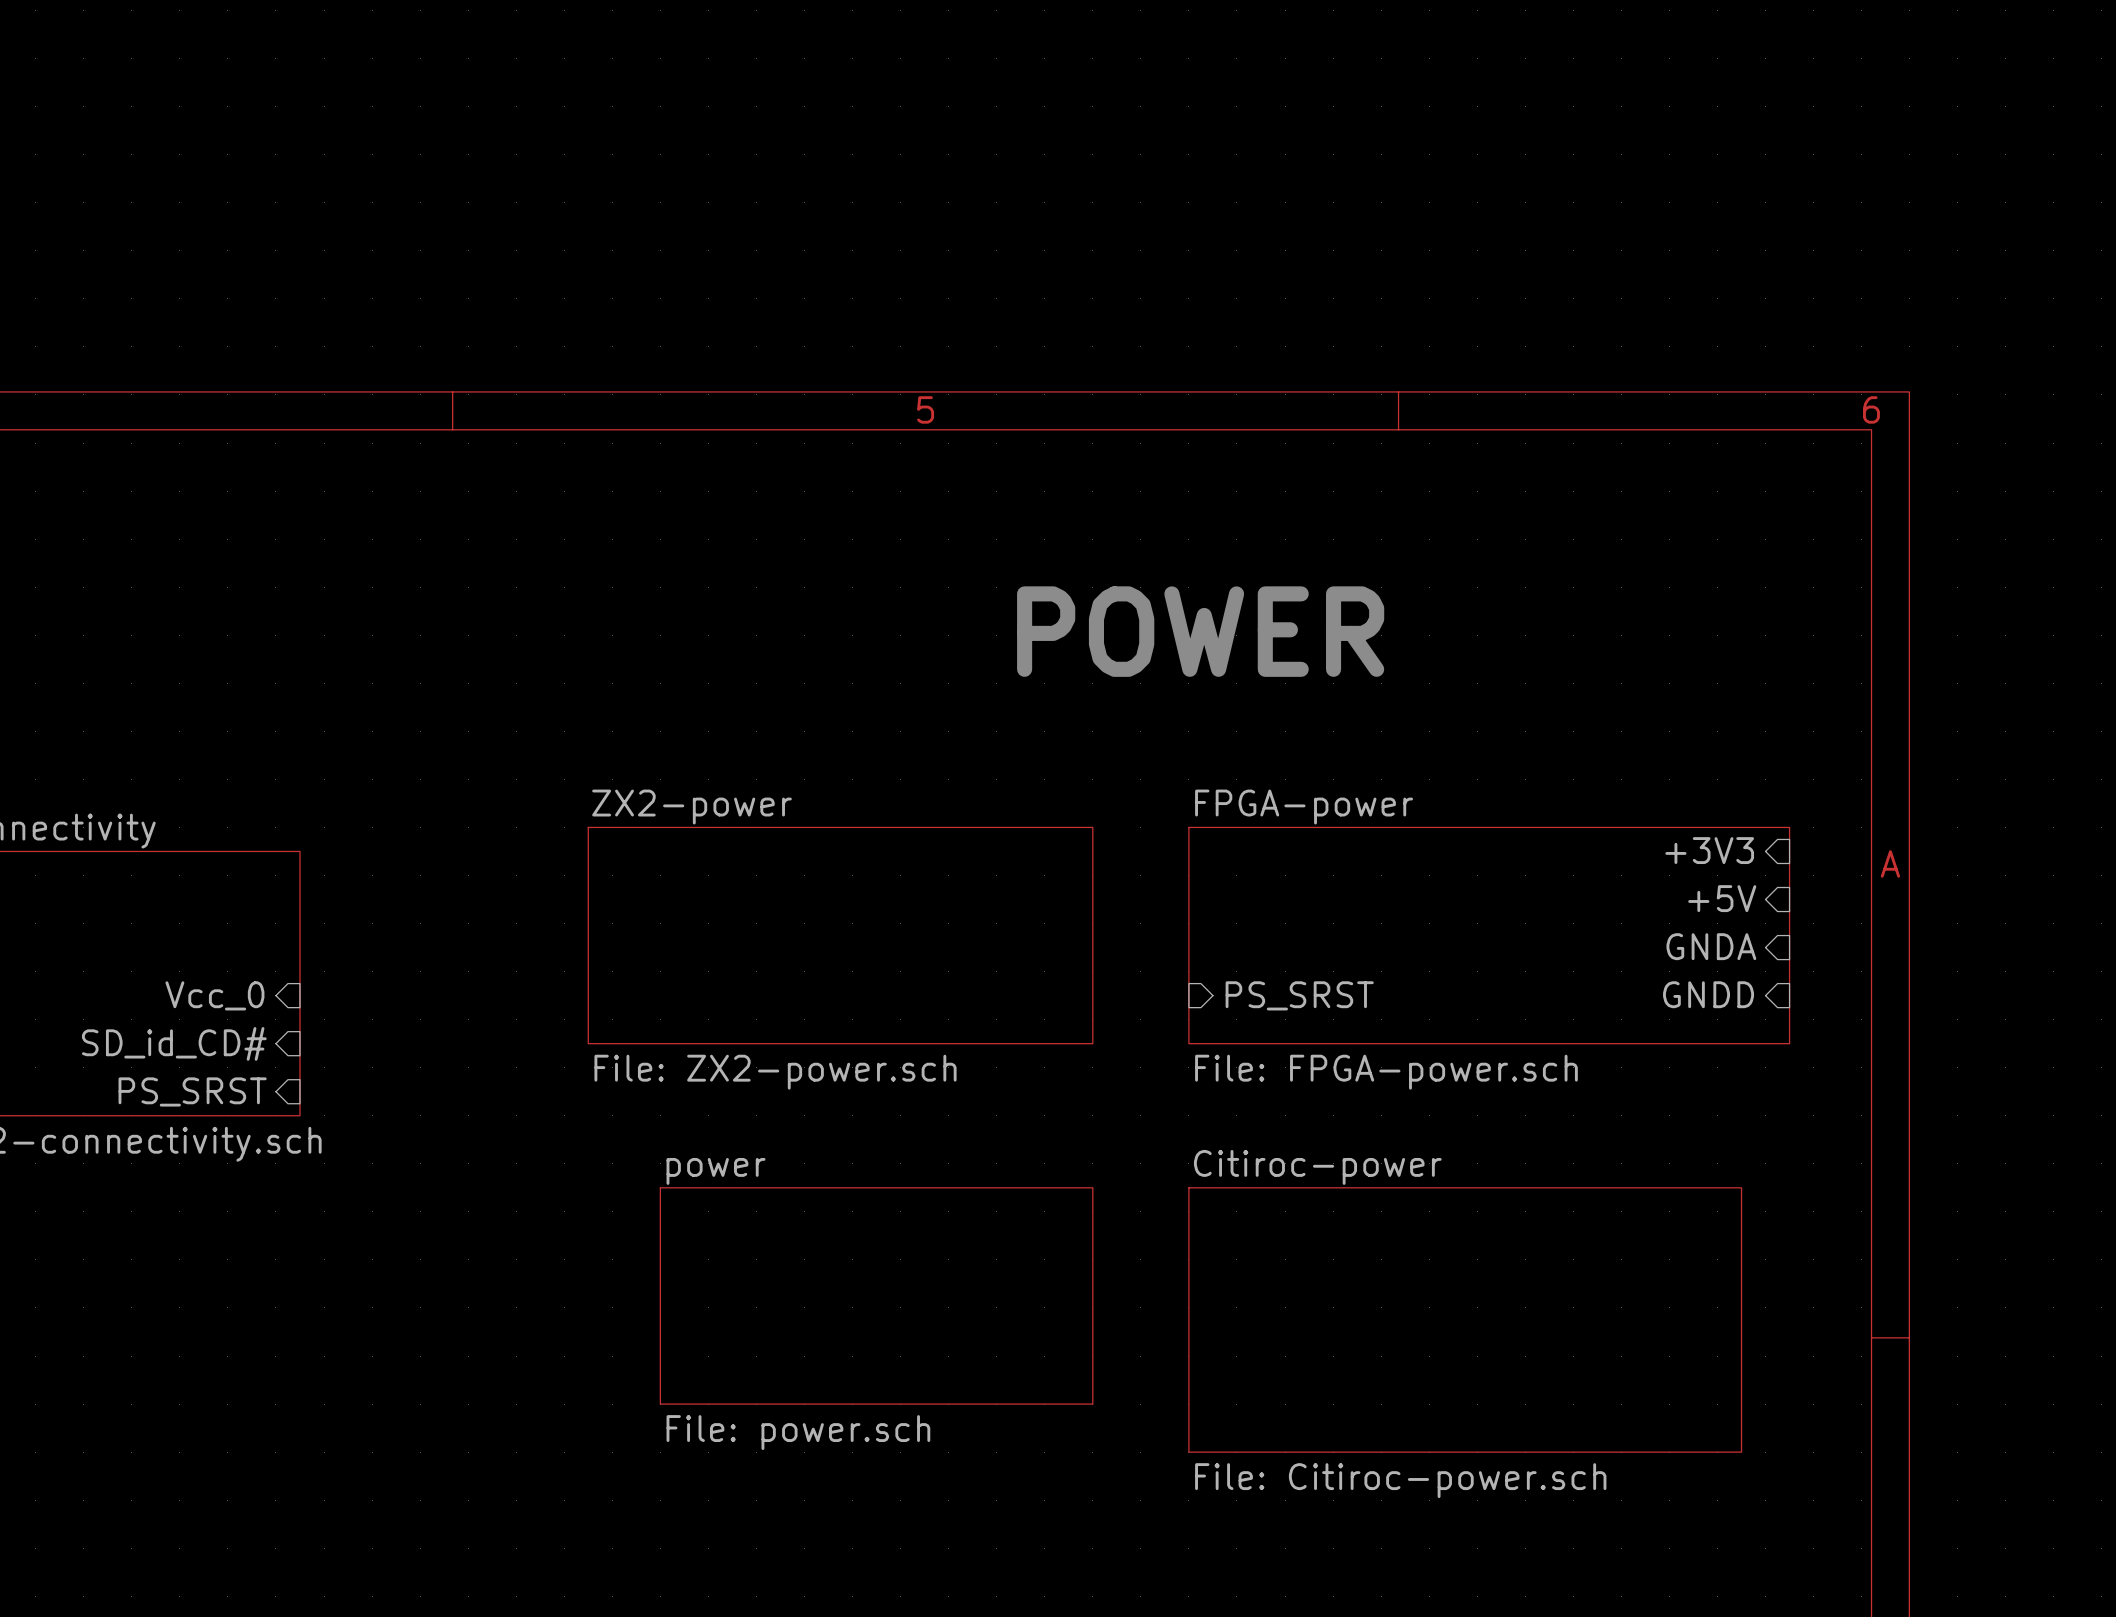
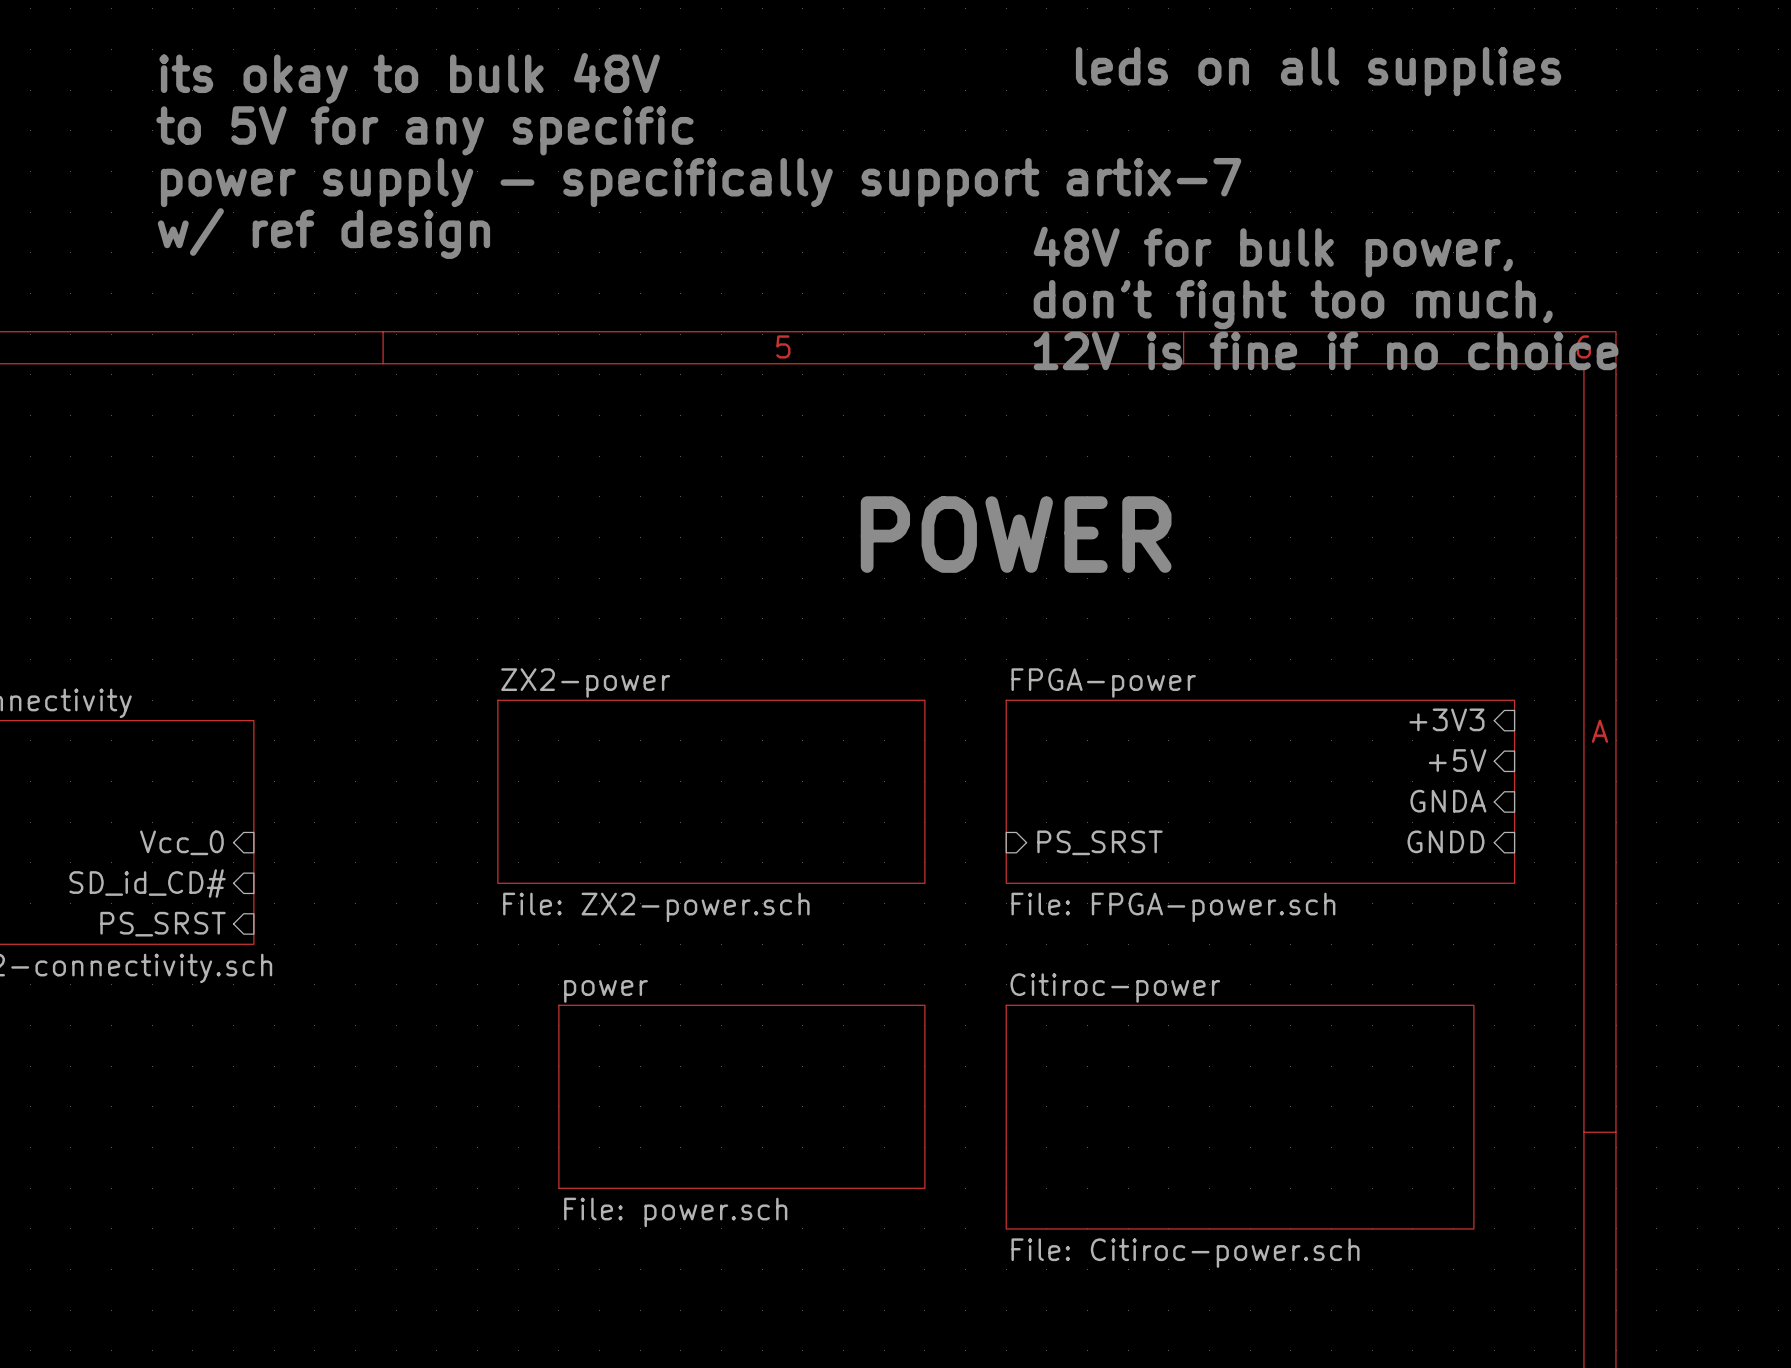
text: none -> leds on all supplies (1318, 71)
text: none -> its okay to bulk 48V (409, 78)
text: none -> to 5V for any specific (424, 130)
text: none -> power supply — specifically support artix-7 (701, 182)
text: none -> w/ ref design (323, 233)
text: none -> 48V for bulk power, (1273, 252)
text: none -> don’t fight too much, (1293, 304)
text: none -> 12V is fine if no choice (1326, 350)

